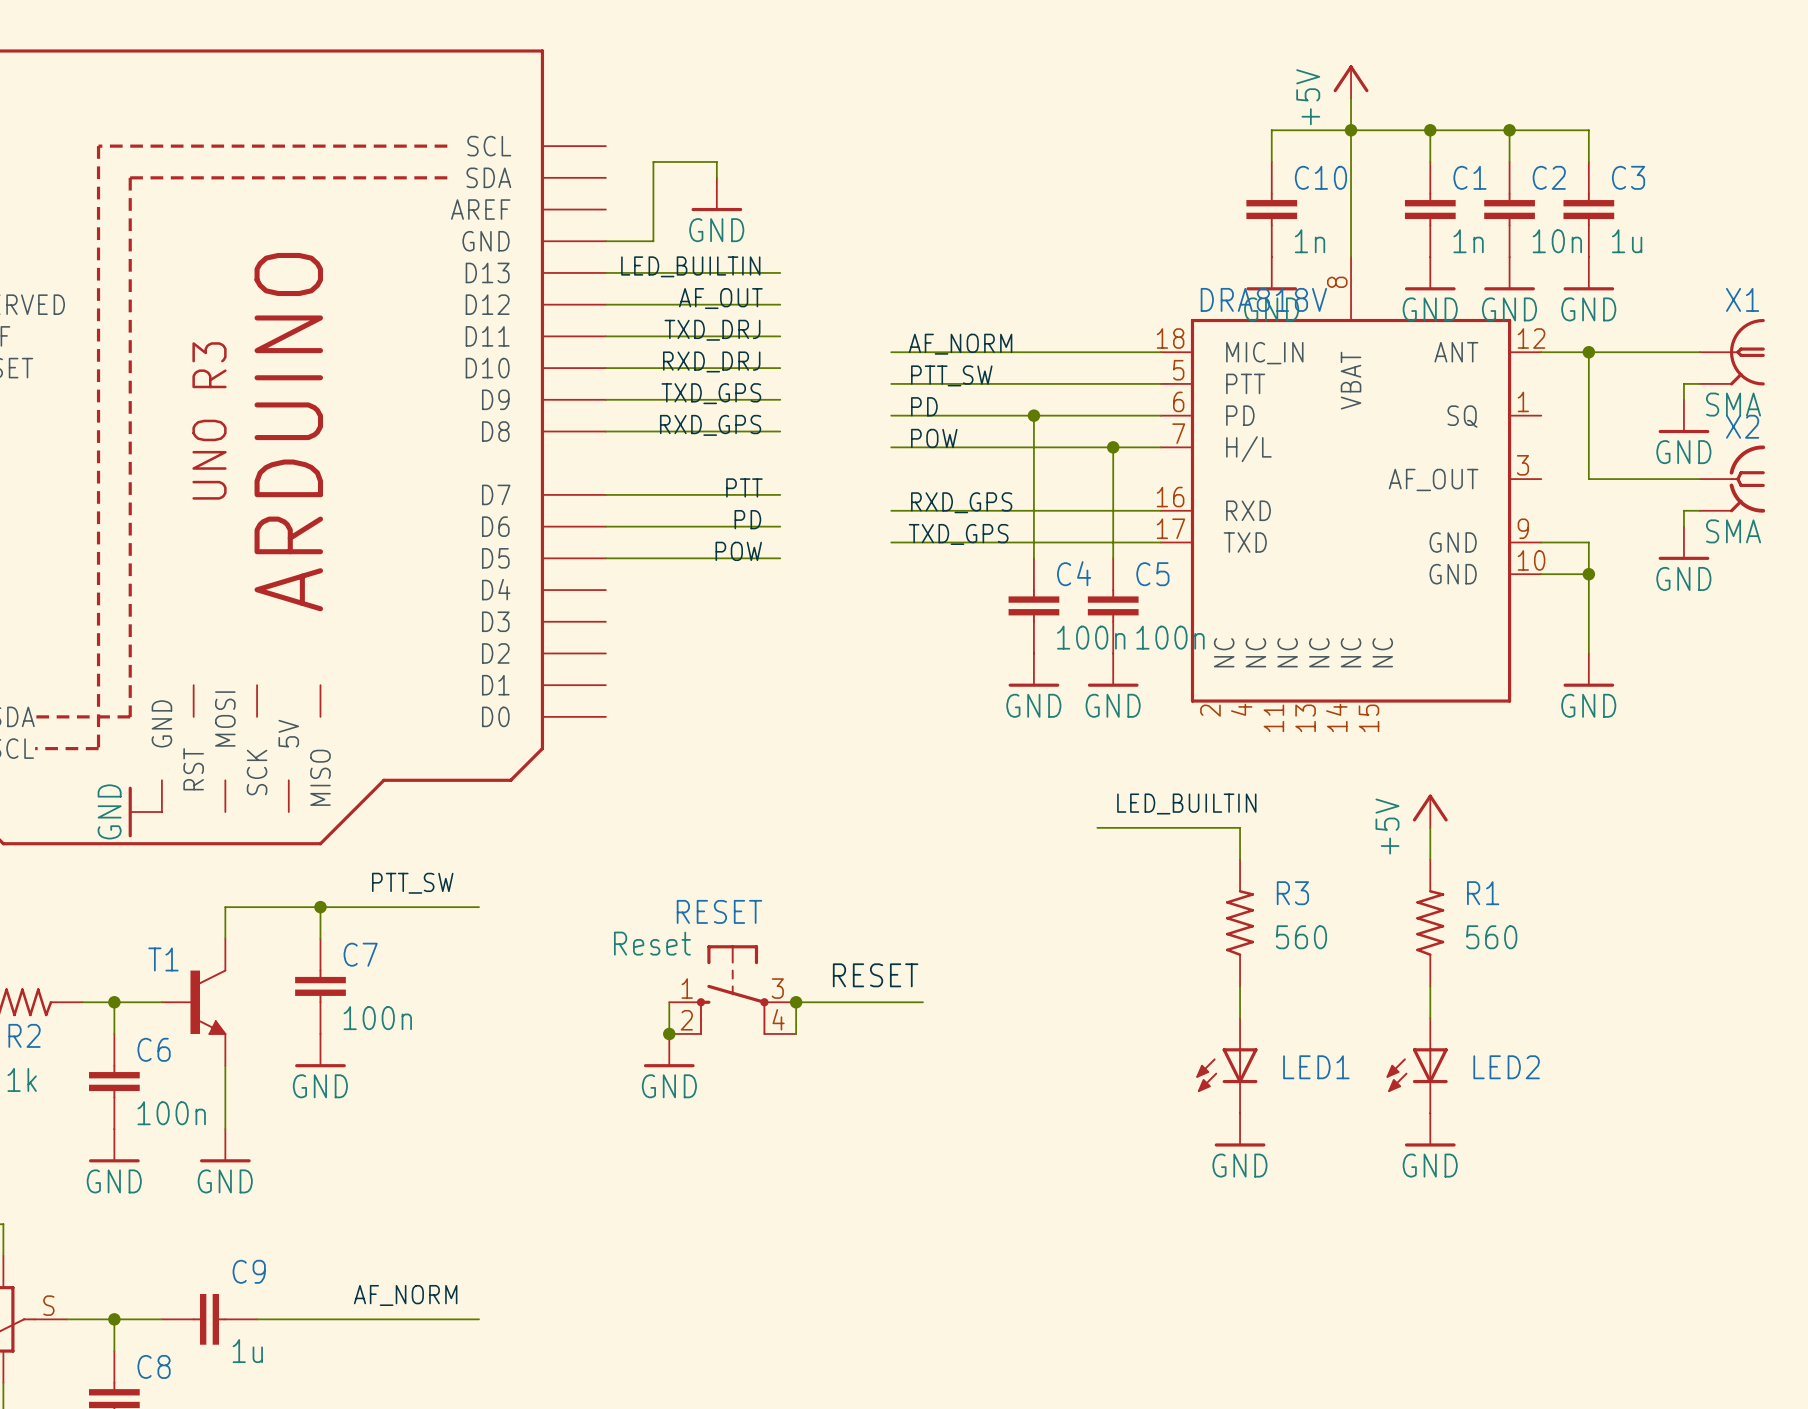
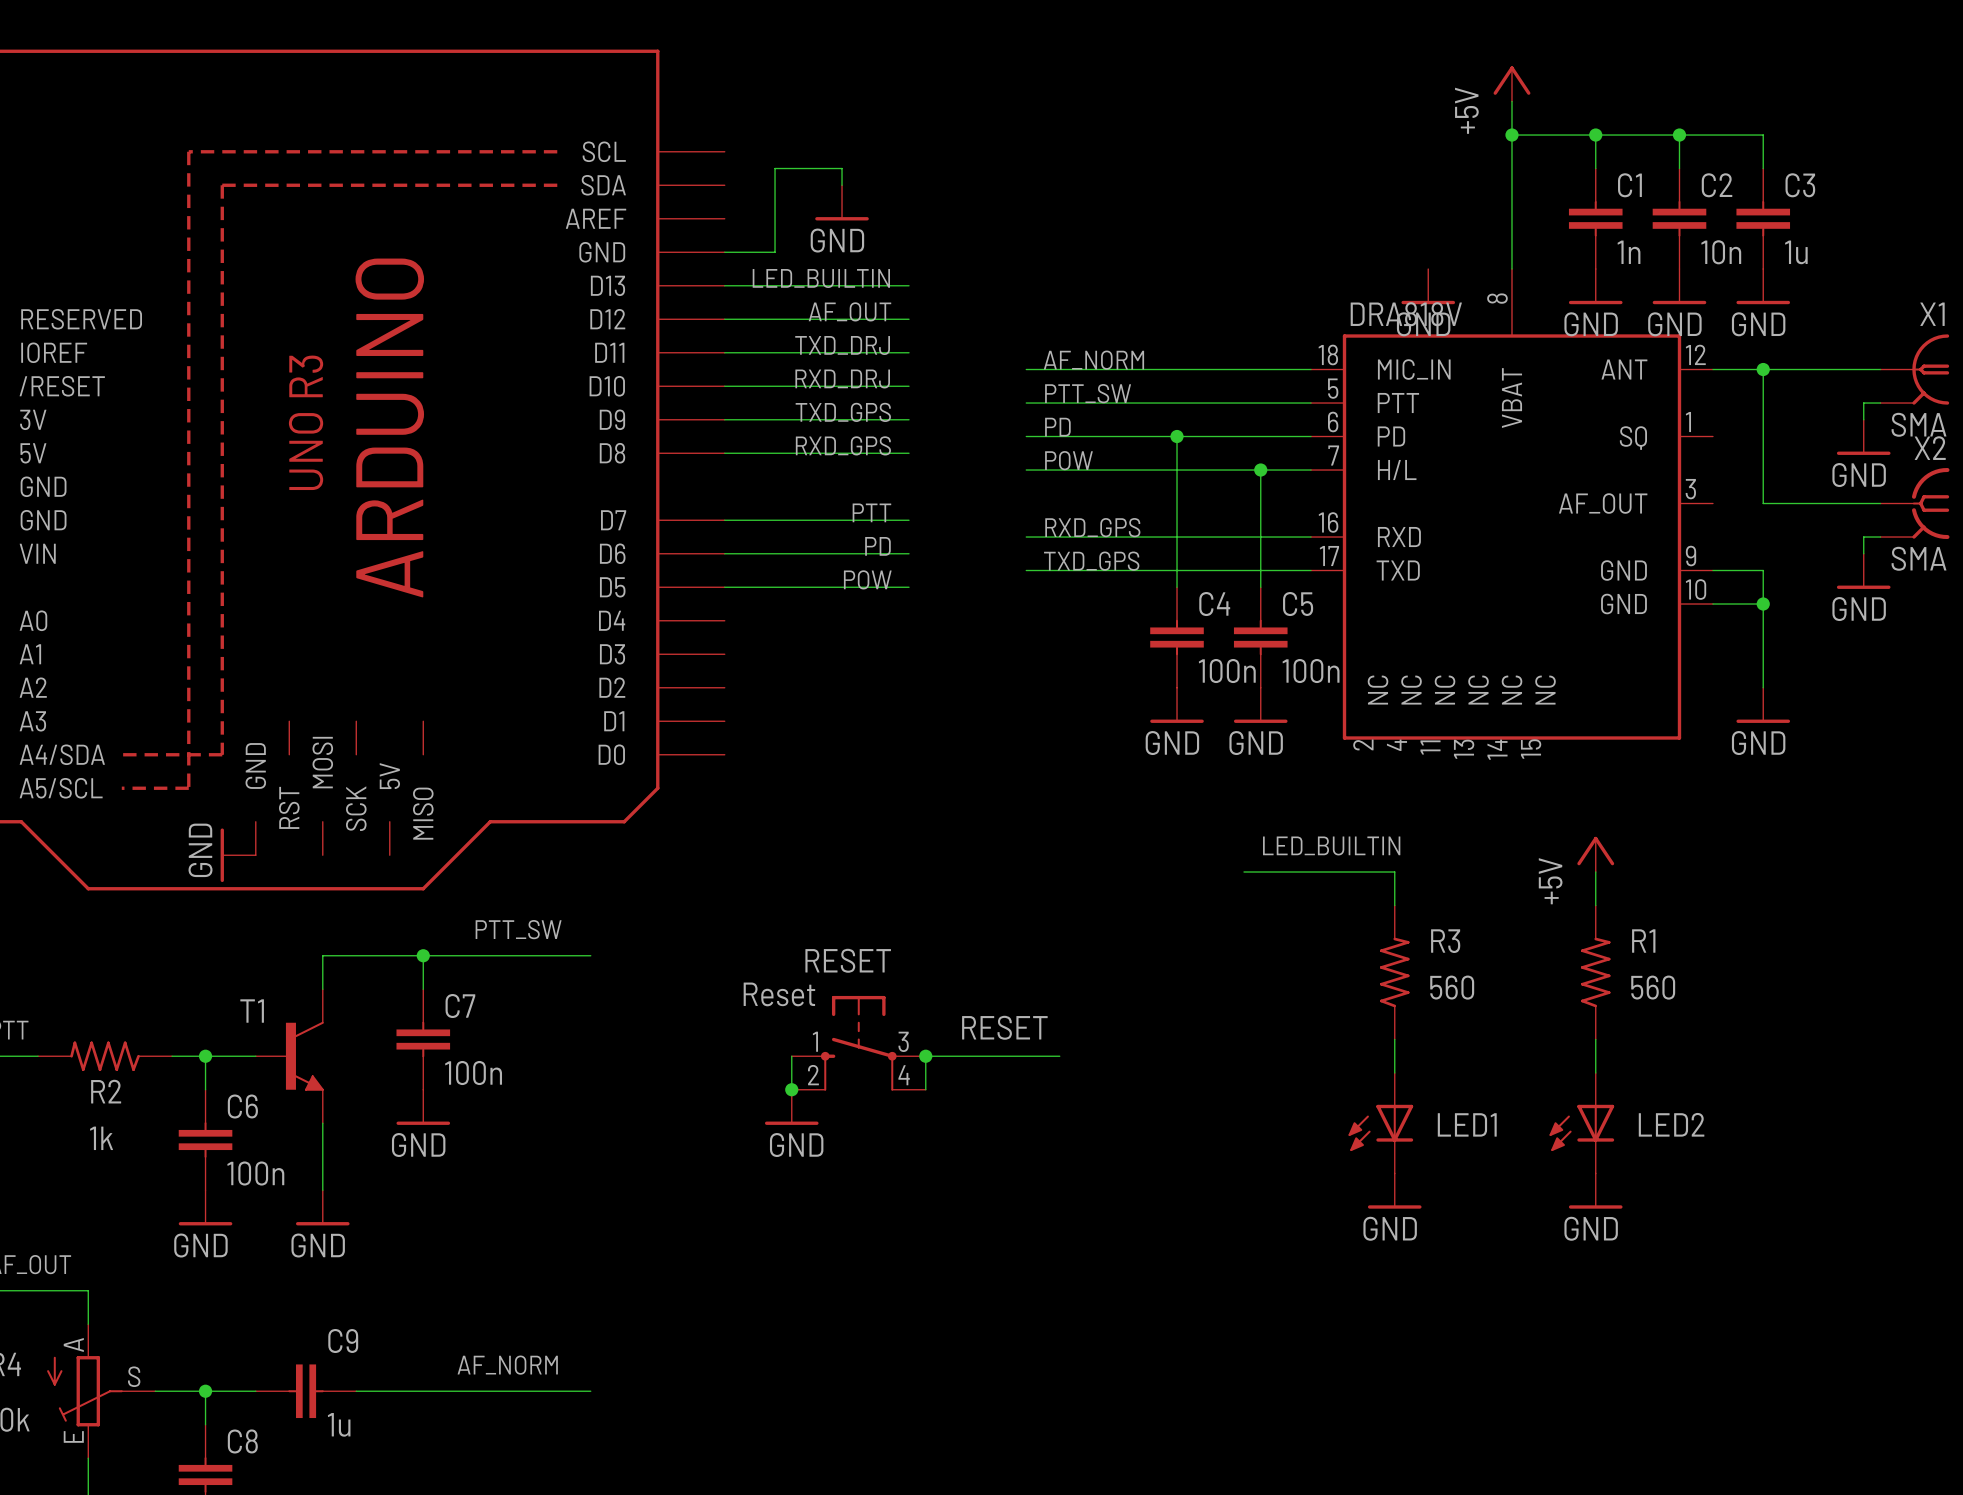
wire: (1351, 130) (1271, 130) (1271, 161) -> none
C10: 1n (1271, 209) -> none

